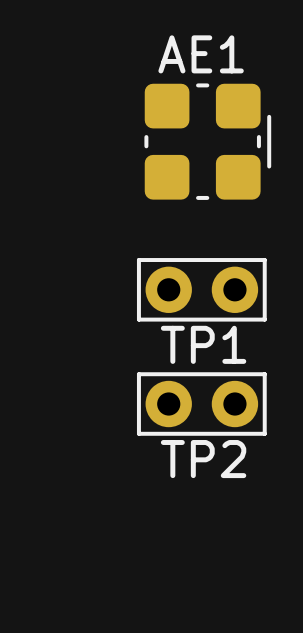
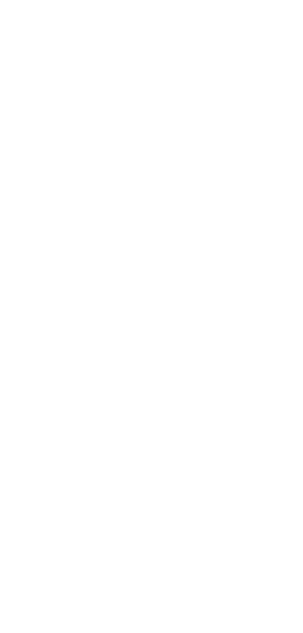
AE1: (207, 141) -> none
TP1: (201, 289) -> none
TP2: (201, 404) -> none

